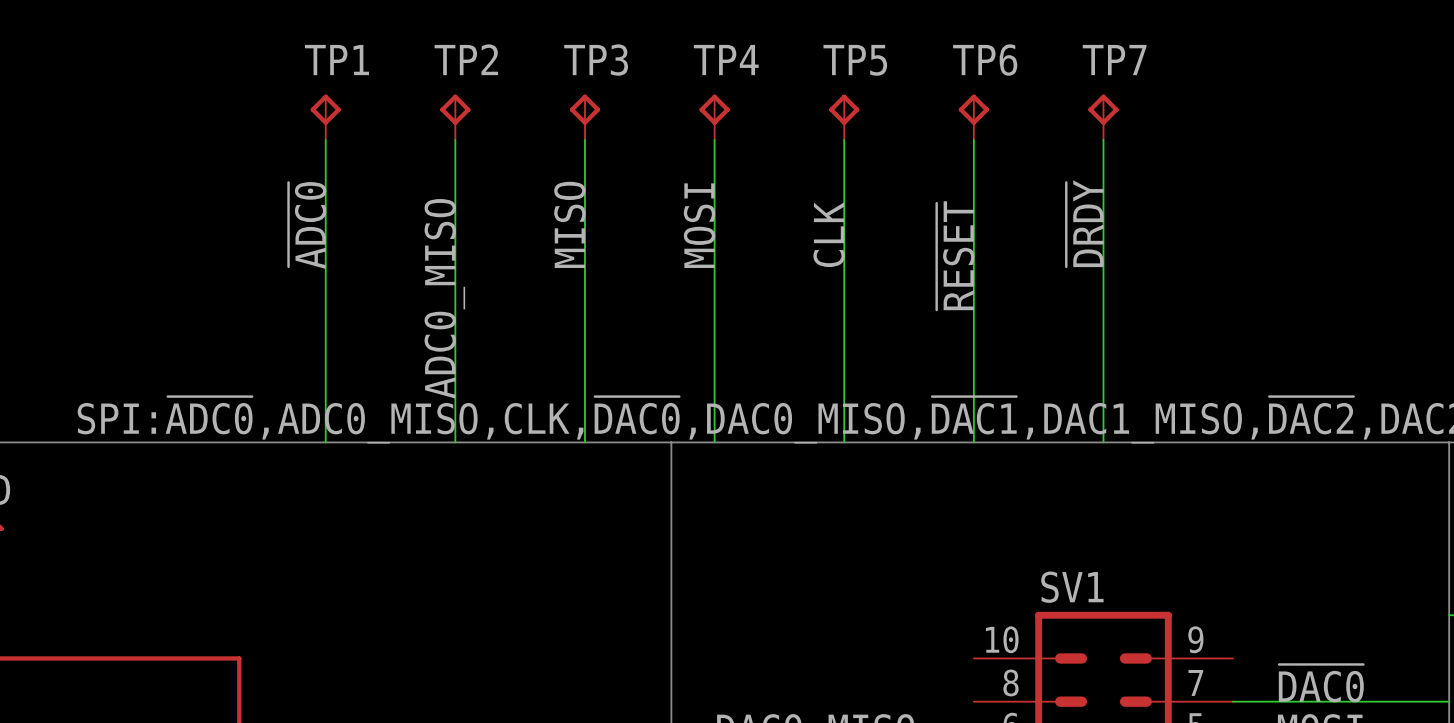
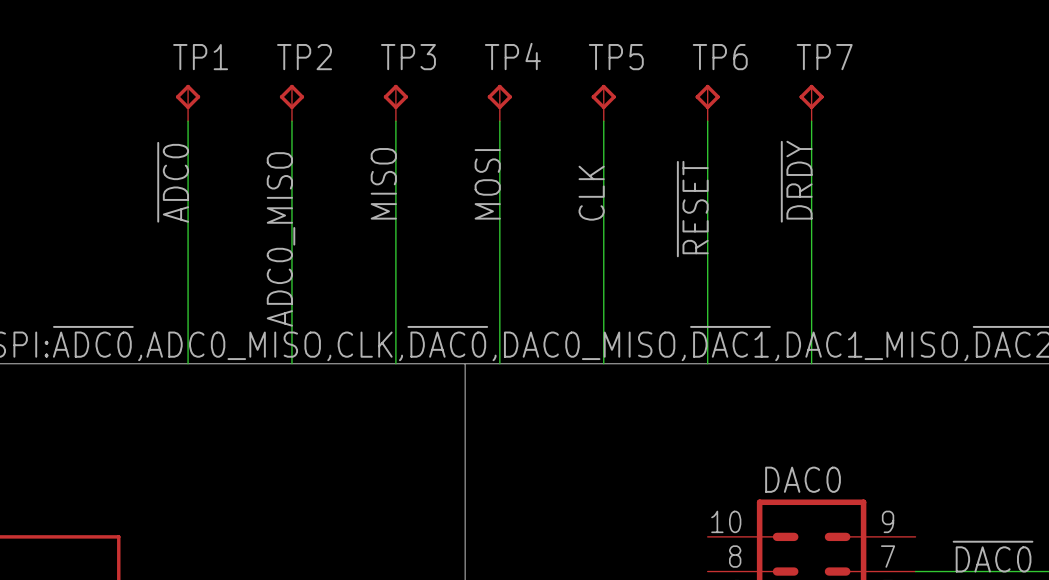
SV1 name: SV1 (1072, 587) -> DAC0 (803, 479)

